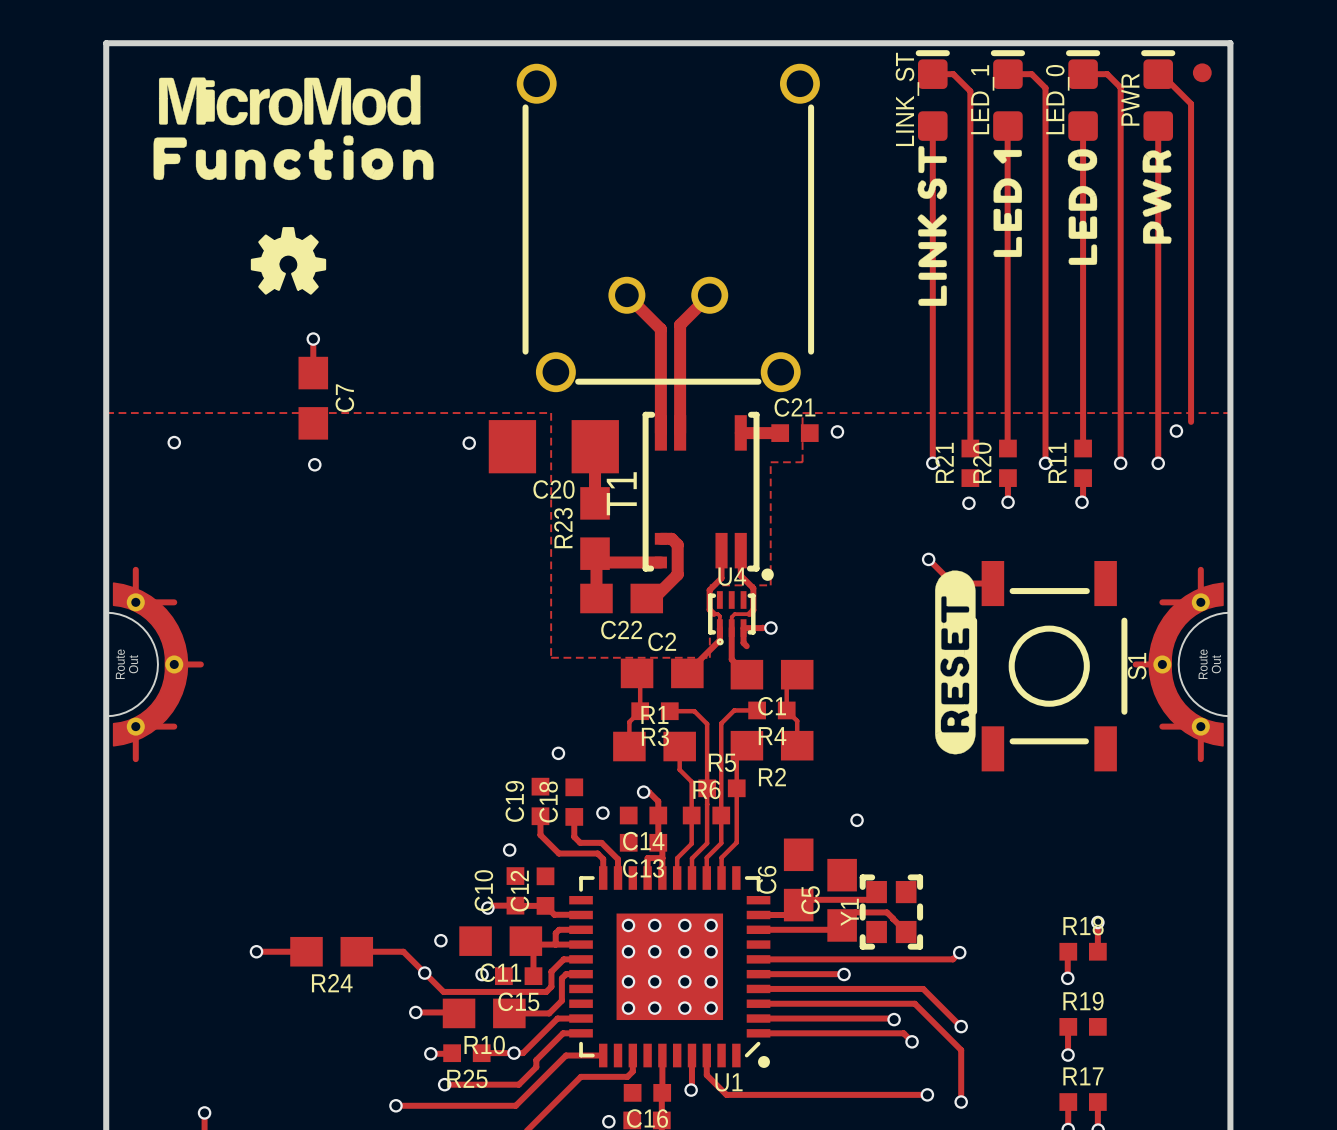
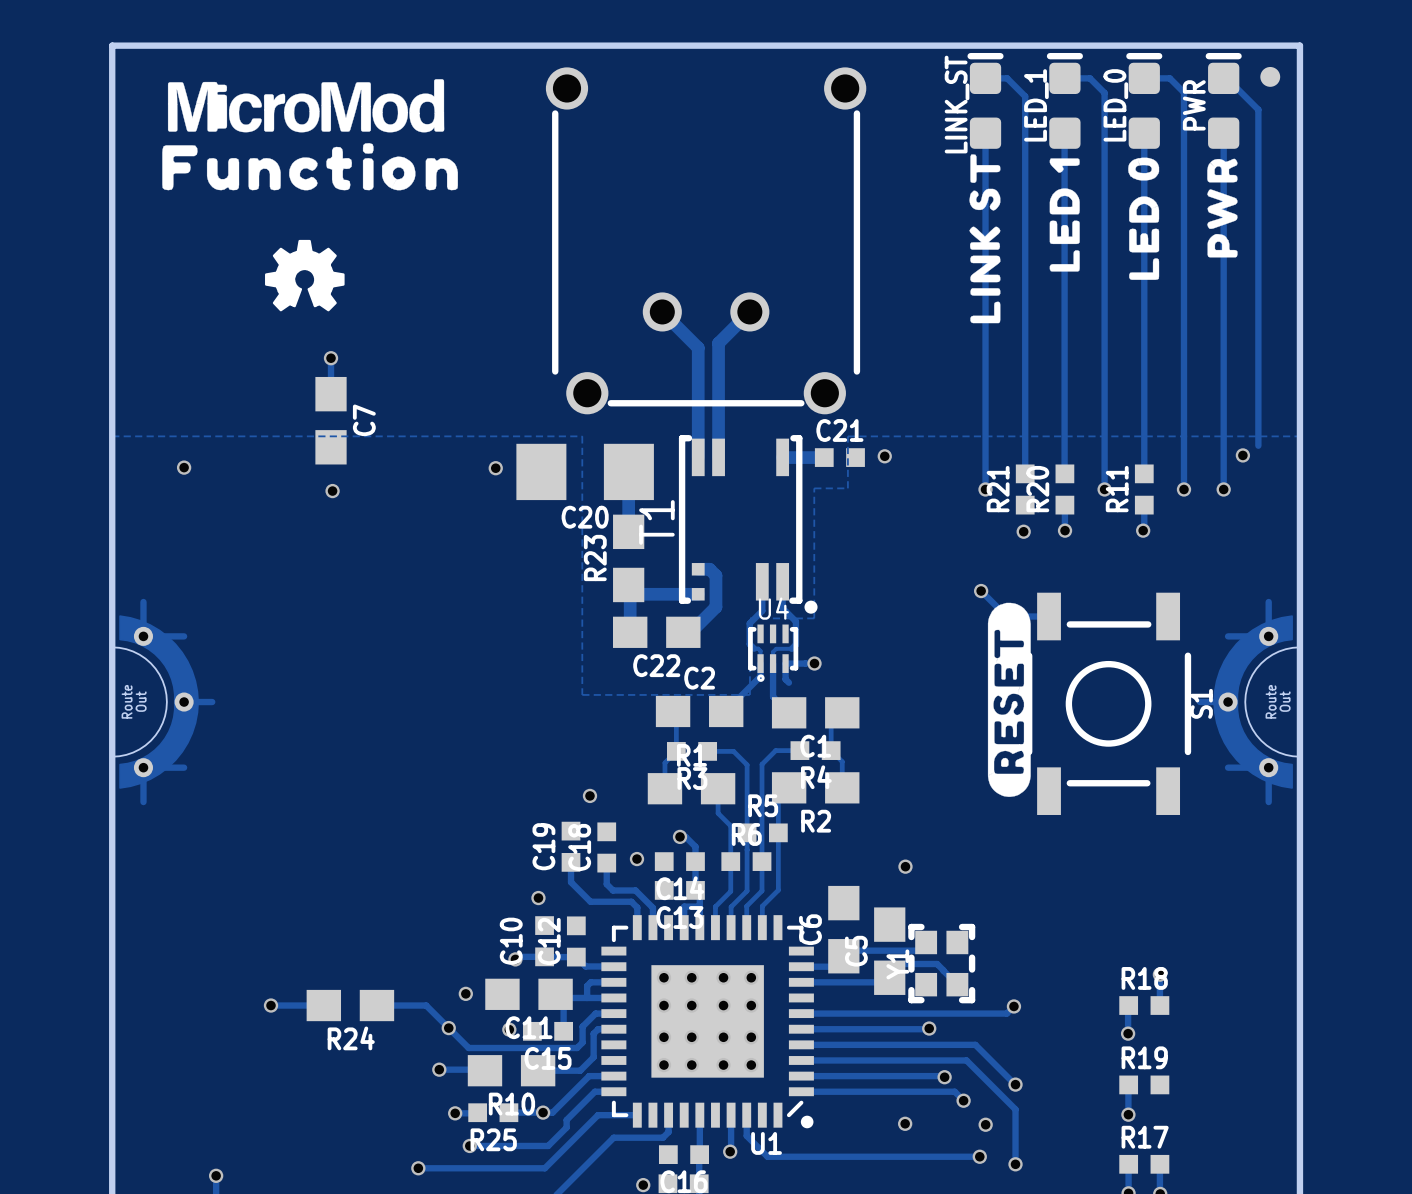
track: none -> (929, 1028) (891, 1029)
via position: (844, 974) -> (929, 1028)
via: none -> (905, 1123)
via: none -> (985, 1124)

